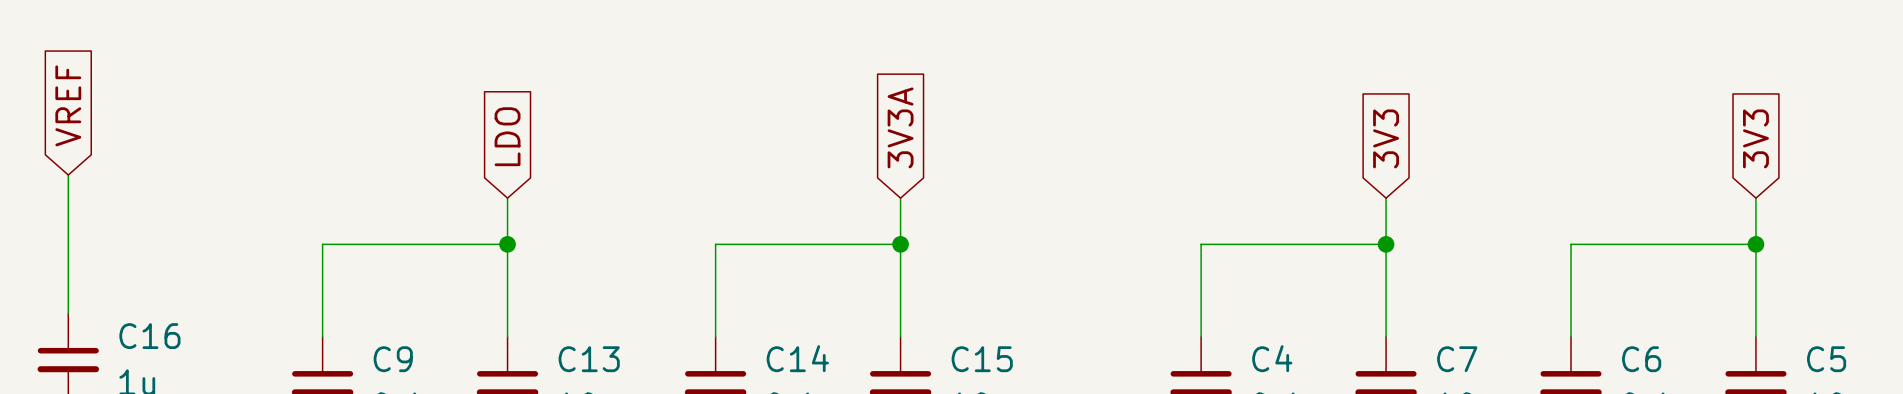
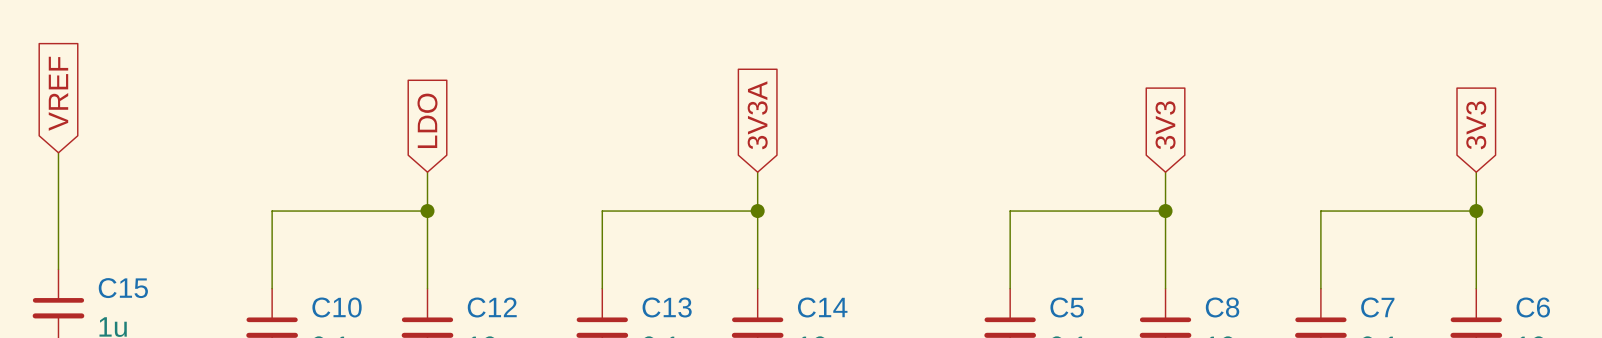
C16 name: C16 (149, 336) -> C15 (123, 288)
C14 name: C14 (797, 358) -> C13 (667, 307)
C4 name: C4 (1272, 358) -> C5 (1067, 307)
C9 name: C9 (393, 359) -> C10 (337, 307)
C13 name: C13 (589, 359) -> C12 (492, 307)
C15 name: C15 (982, 359) -> C14 (822, 307)
C7 name: C7 (1457, 359) -> C8 (1222, 307)
C6 name: C6 (1641, 359) -> C7 (1377, 307)
C5 name: C5 (1826, 359) -> C6 (1533, 307)

